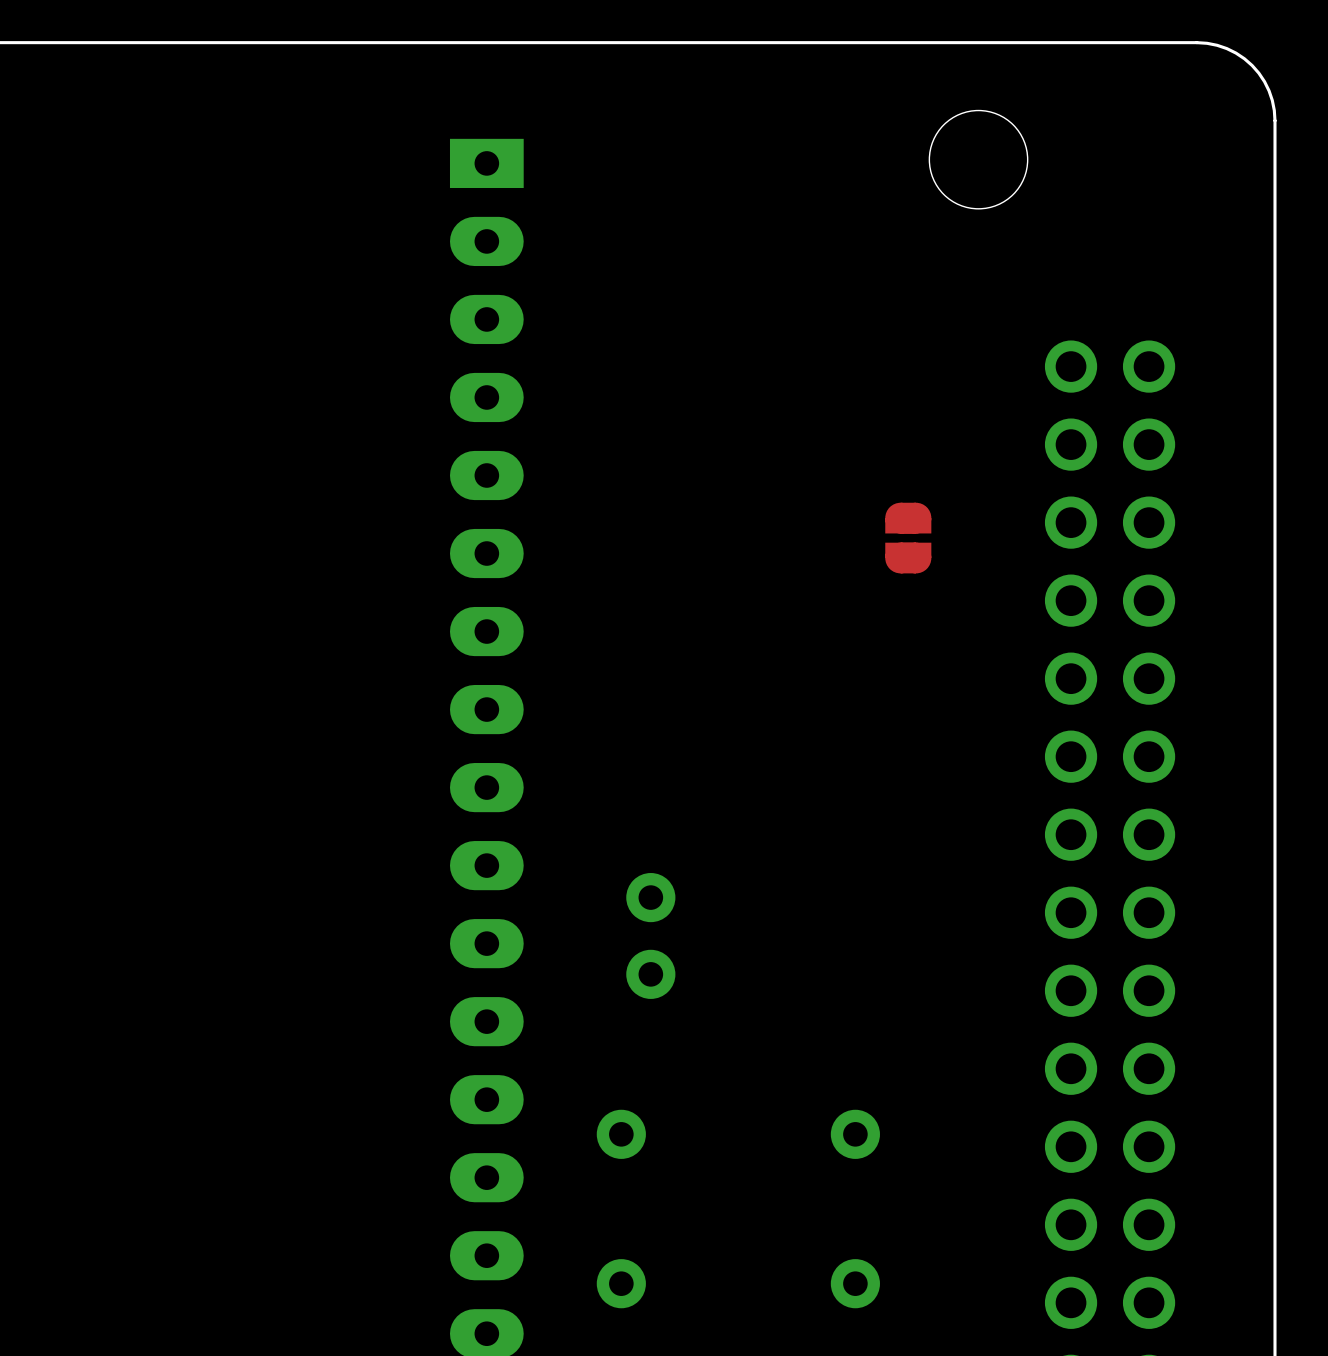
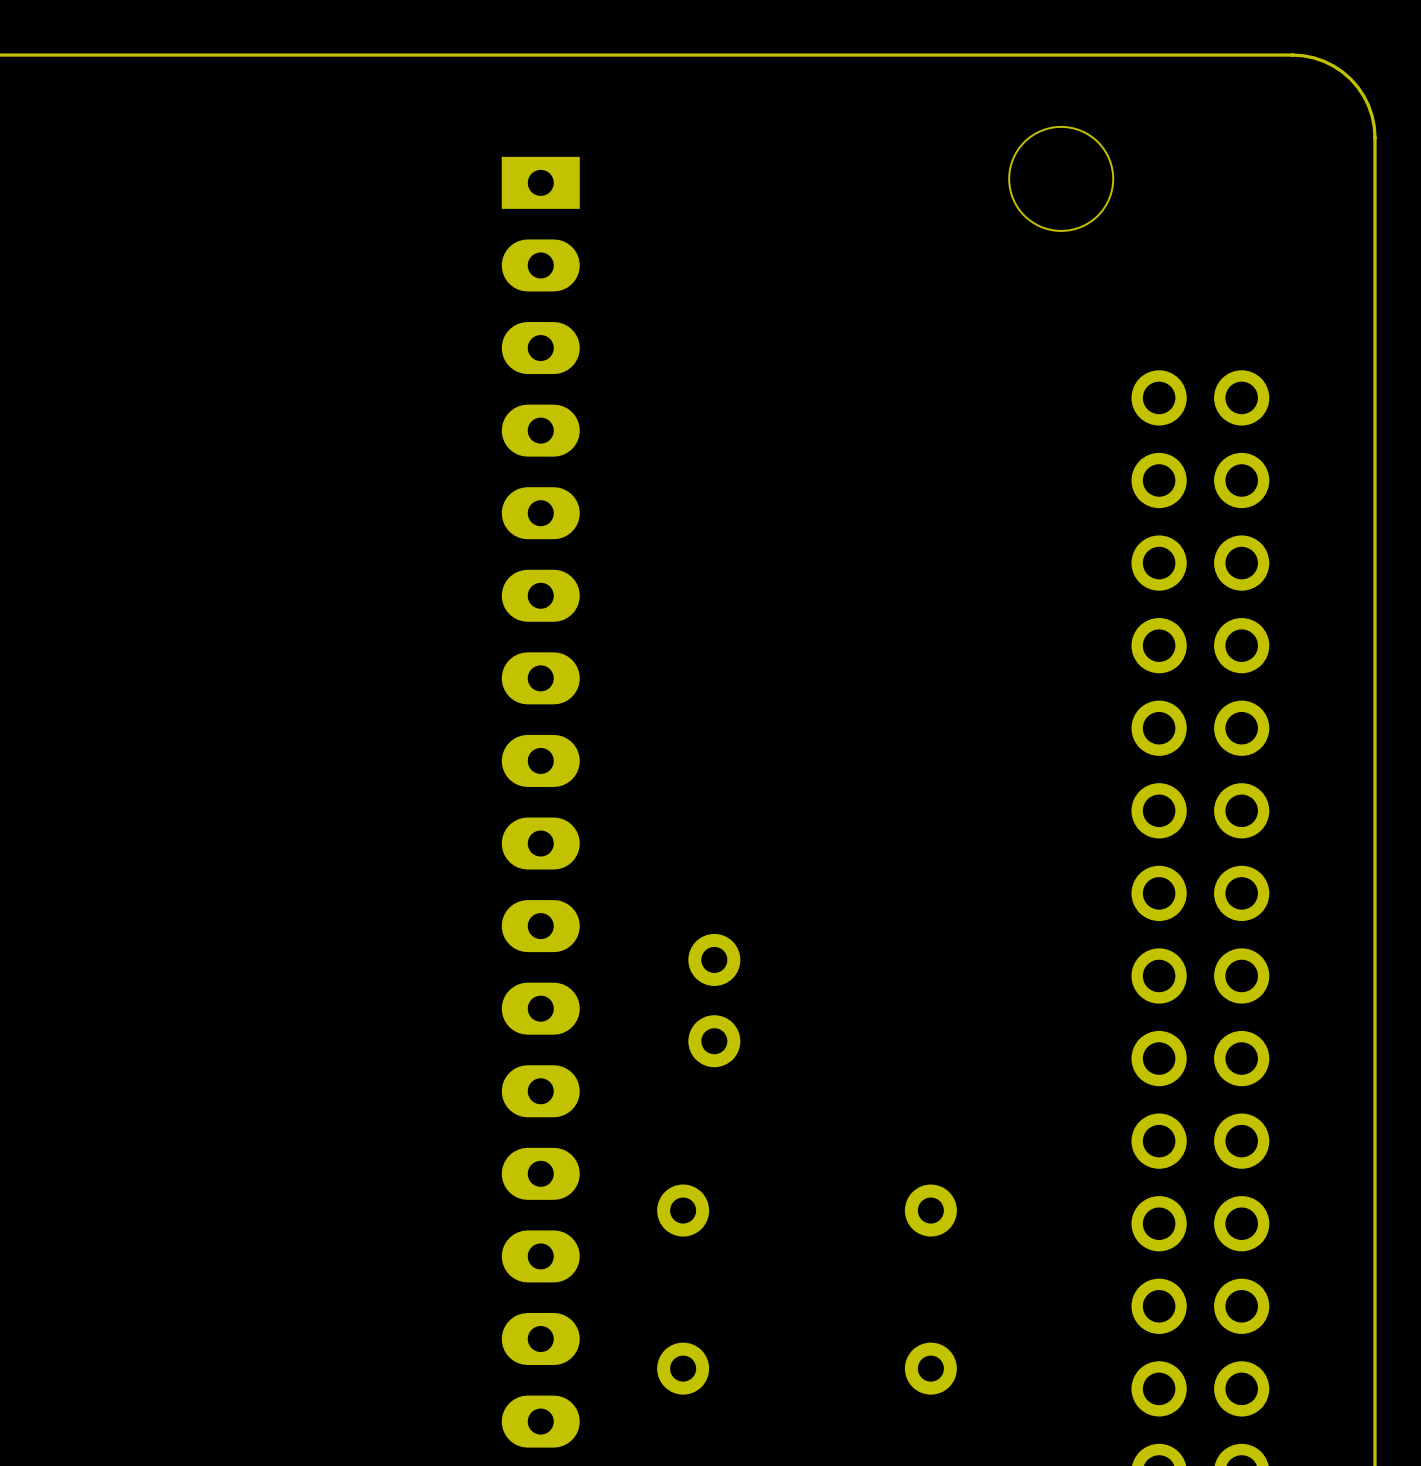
part: (908, 538) -> none

